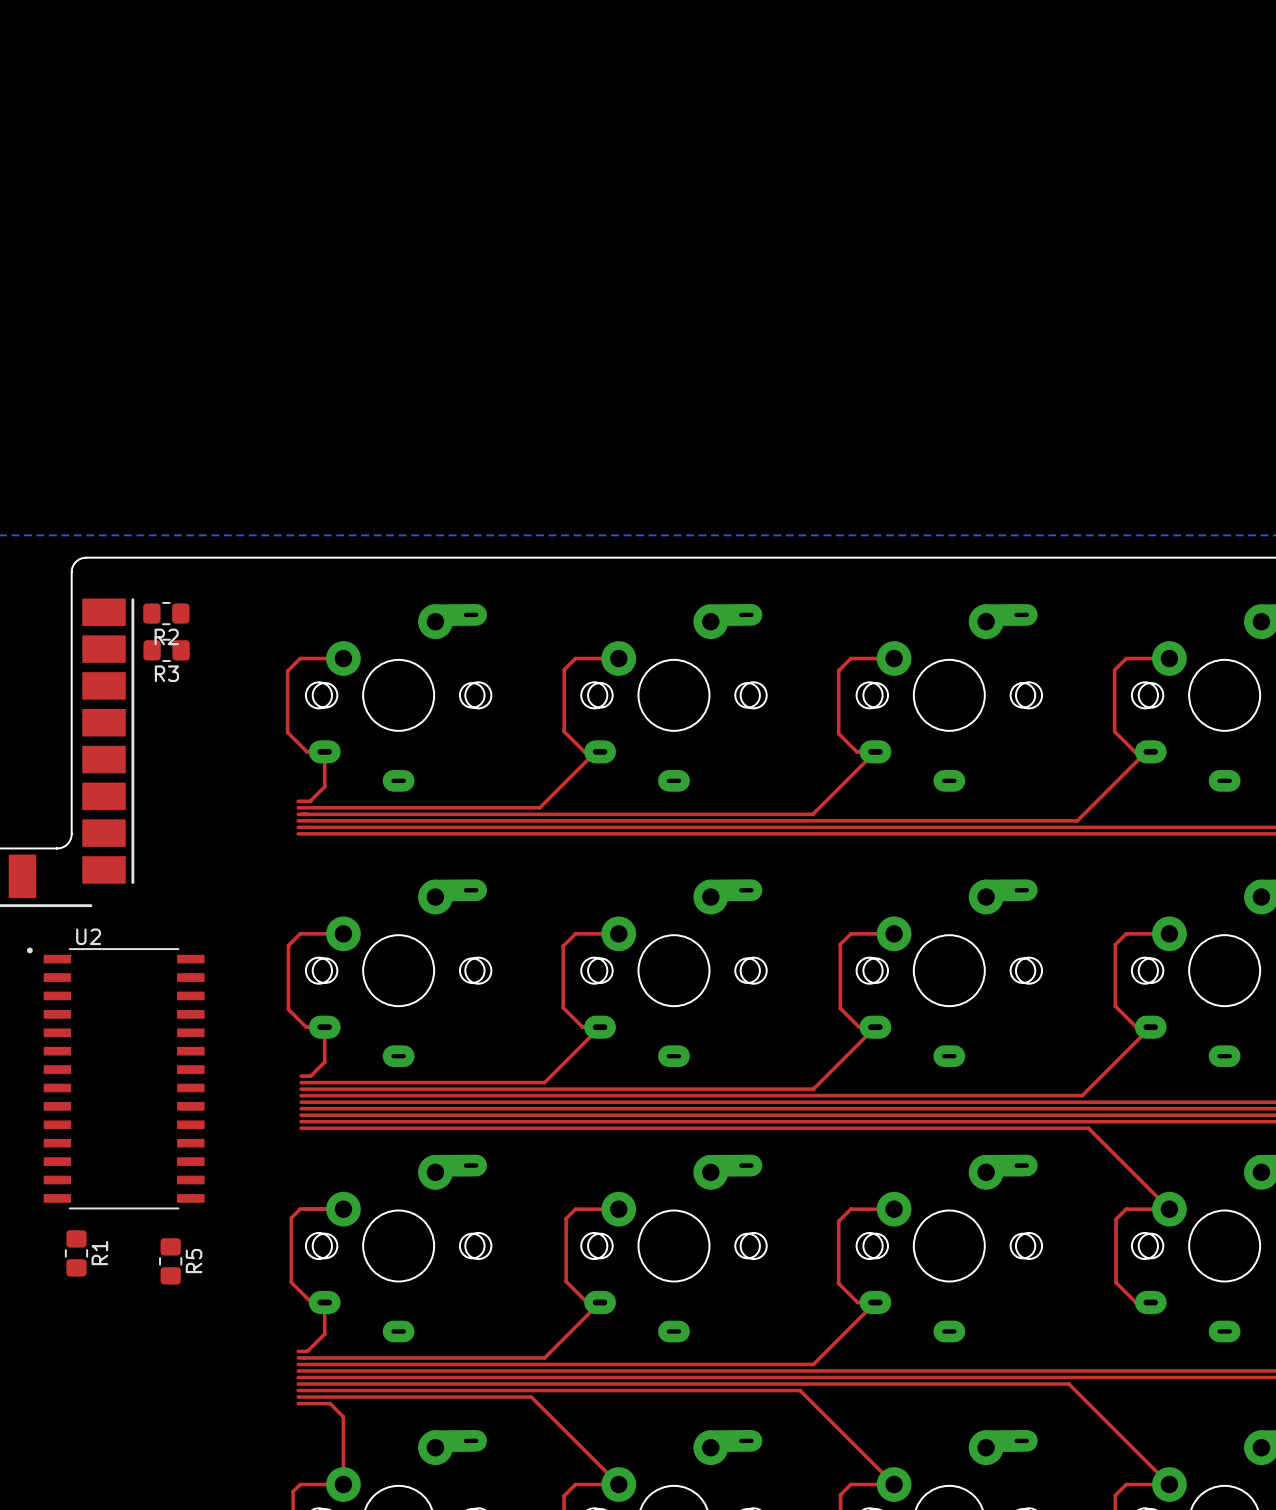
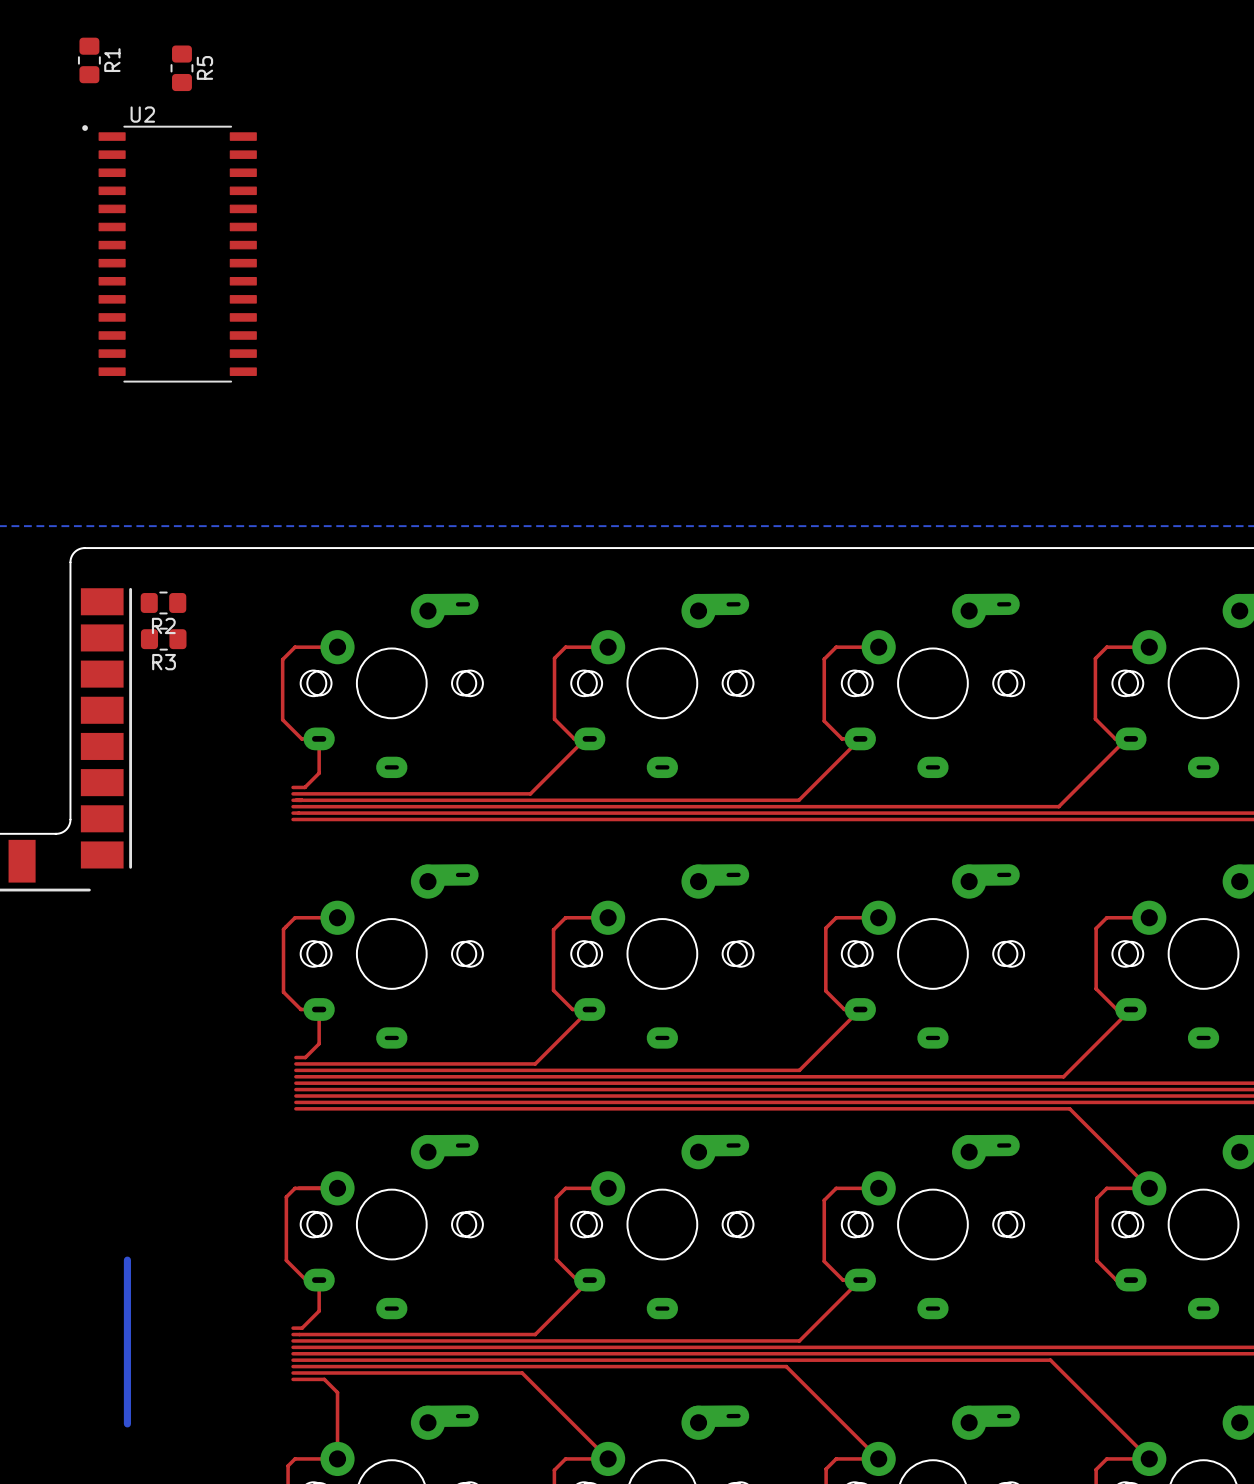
U2 position: (115, 1078) -> (169, 253)
R1 position: (76, 1253) -> (89, 60)
R5 position: (170, 1261) -> (181, 68)
bottom track: none -> (127, 1260) (127, 1423)

